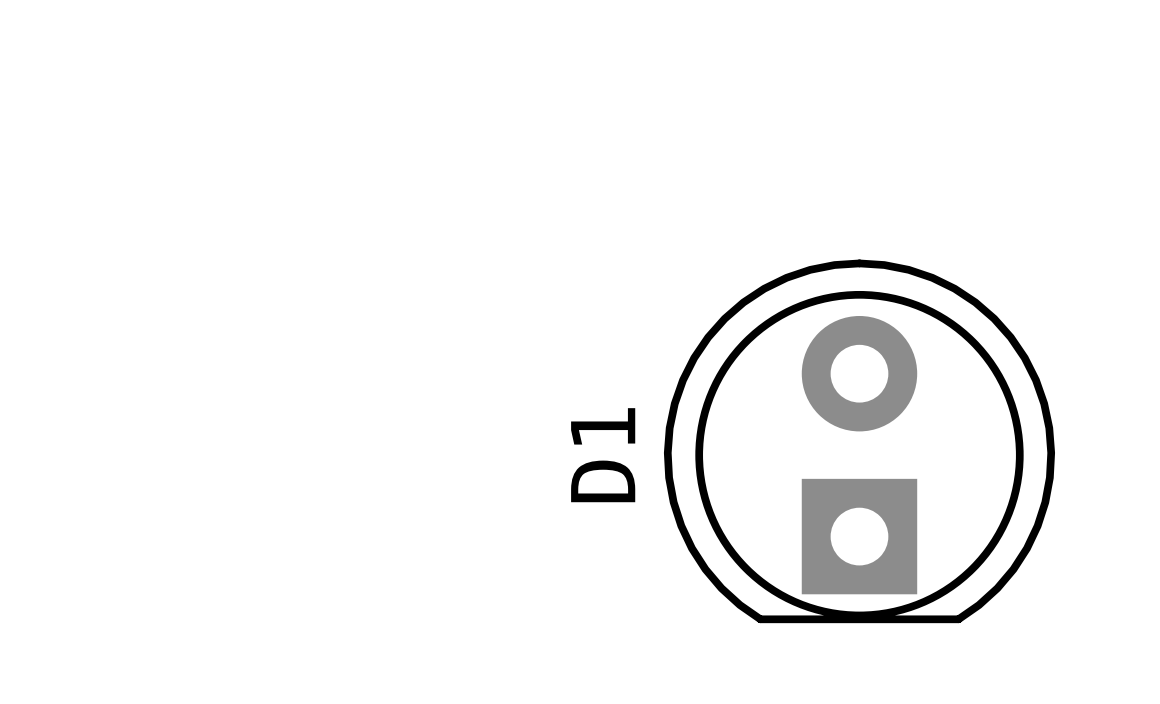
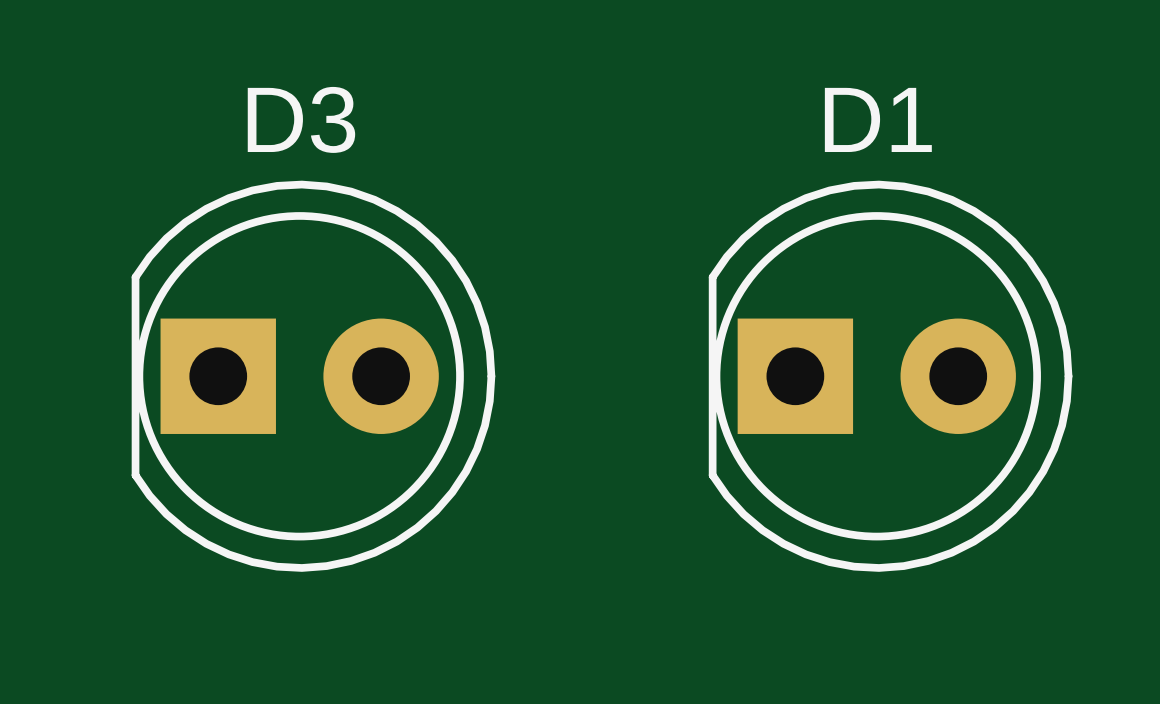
D3: none -> (313, 376)
D1 rotation: 0° (859, 441) -> 90° clockwise (890, 376)

